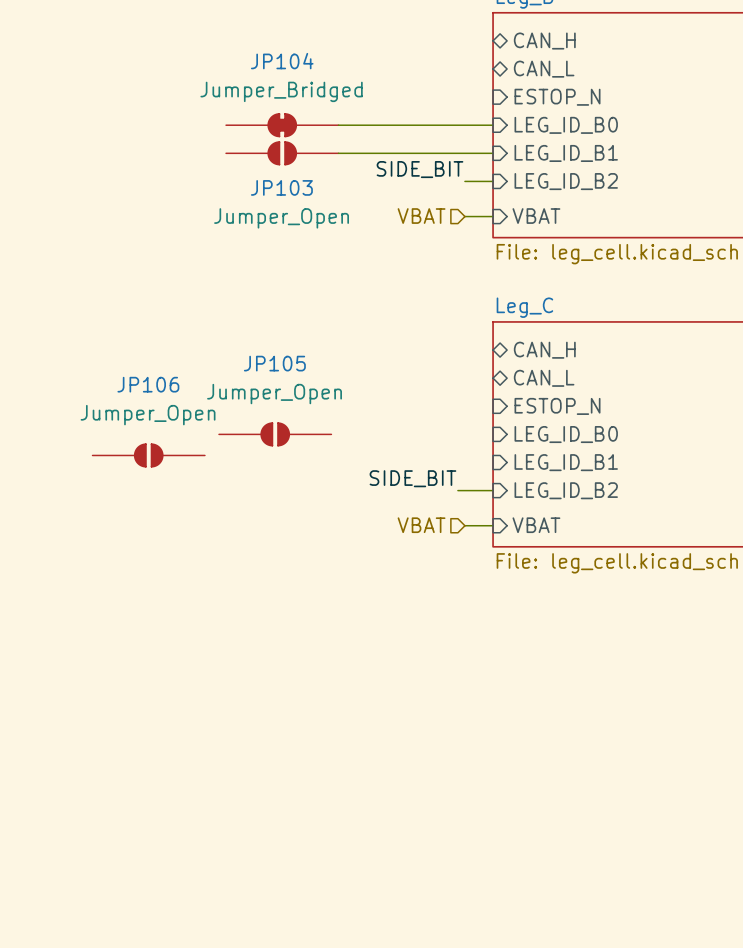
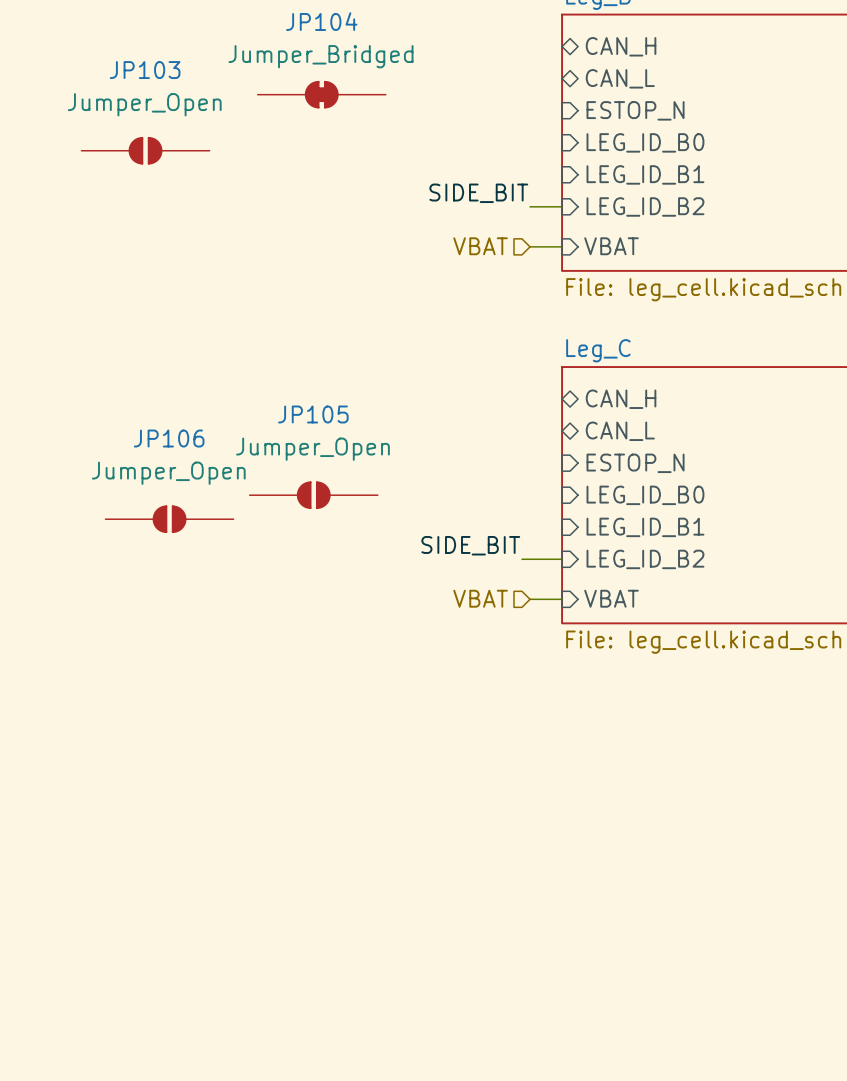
JP104 position: (282, 125) -> (321, 94)
wire: (338, 125) (493, 125) -> none
JP103 position: (282, 153) -> (145, 150)
wire: (338, 153) (493, 153) -> none
JP103 name position: JP103 (281, 187) -> JP103 (145, 70)
JP103 value position: Jumper_Open (281, 218) -> Jumper_Open (144, 104)

